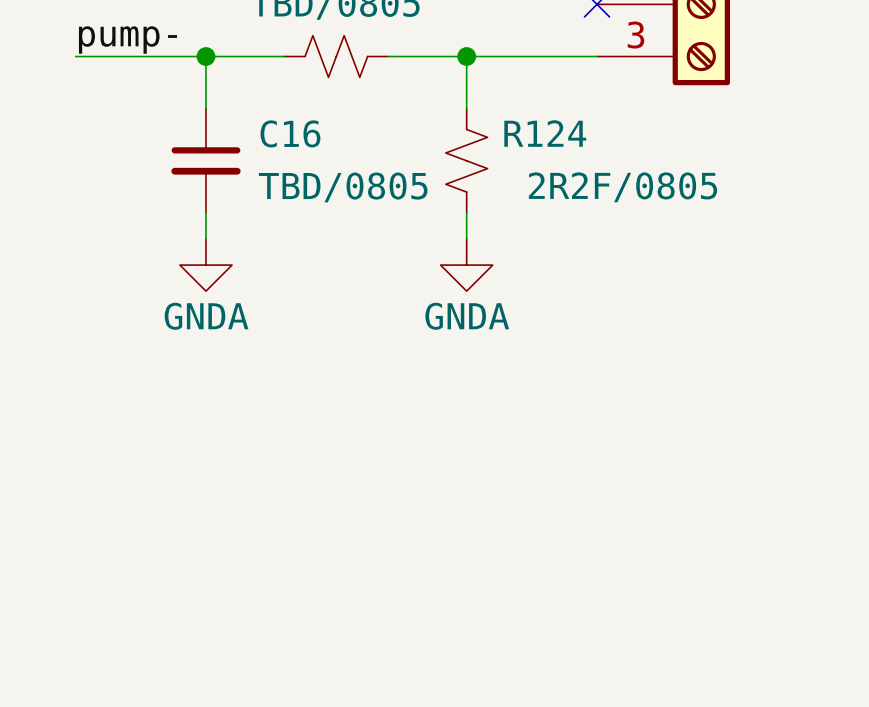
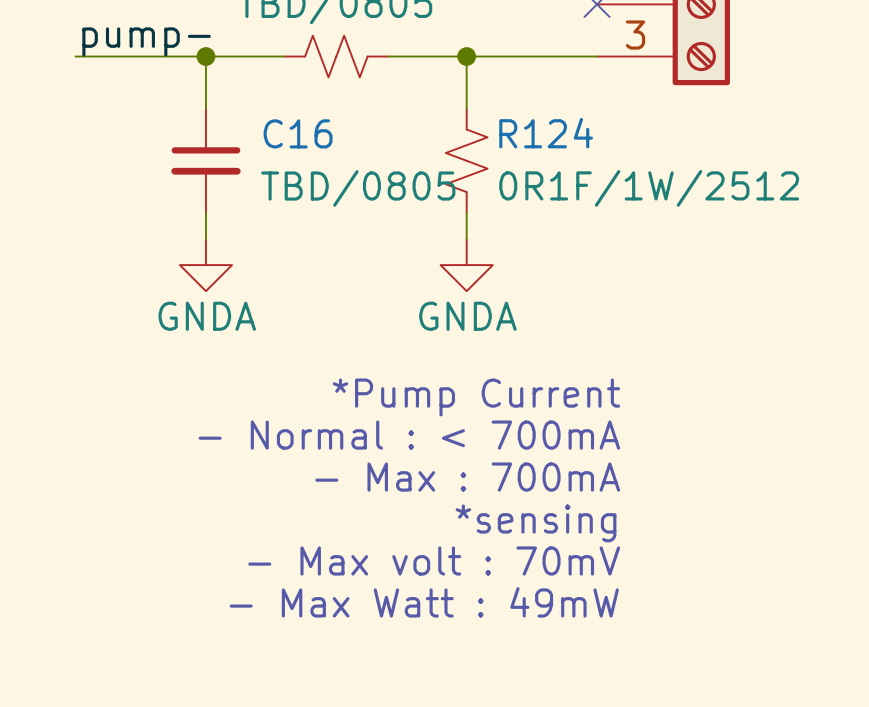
R124 value: 2R2F/0805 (622, 187) -> 0R1F/1W/2512 (649, 188)
text: none -> *Pump Current (476, 397)
text: none -> - Normal : < 700mA (409, 435)
text: none -> - Max : 700mA (467, 477)
text: none -> *sensing (536, 523)
text: none -> - Max volt : 70mV (434, 561)
text: none -> - Max Watt : 49mW (424, 602)

